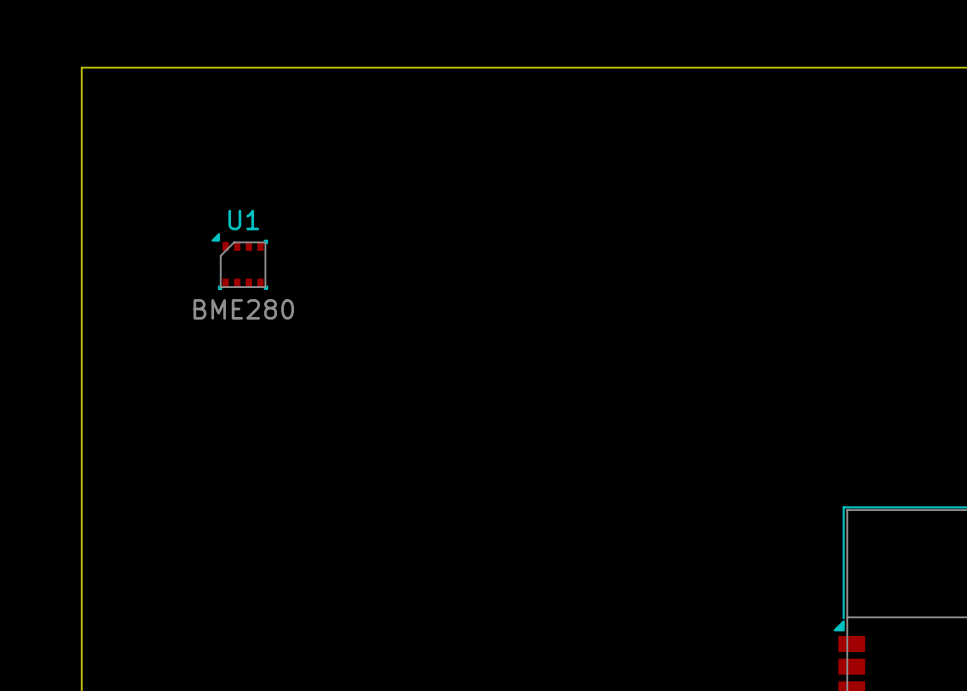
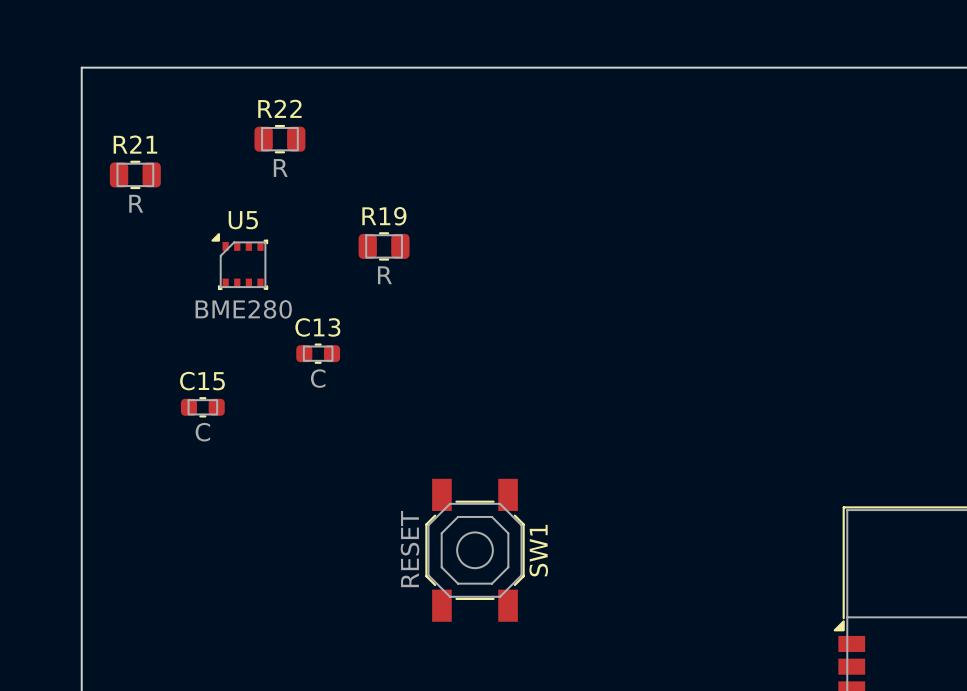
R22: none -> R (279, 139)
R21: none -> R (135, 174)
U1 name: U1 (243, 220) -> U5 (243, 220)
R19: none -> R (384, 246)
C13: none -> C (318, 353)
C15: none -> C (202, 407)
SW1: none -> RESET (475, 550)

